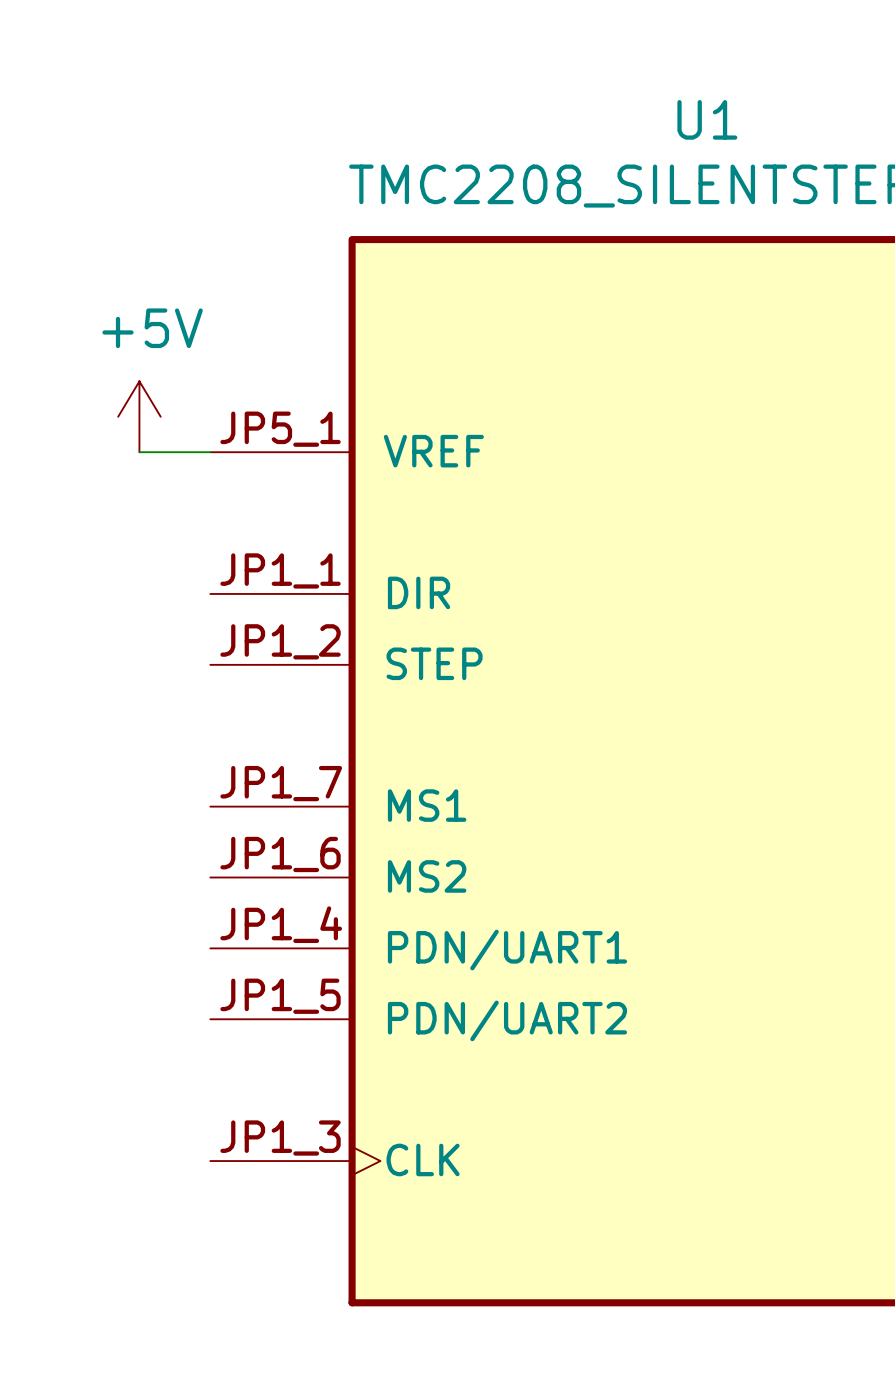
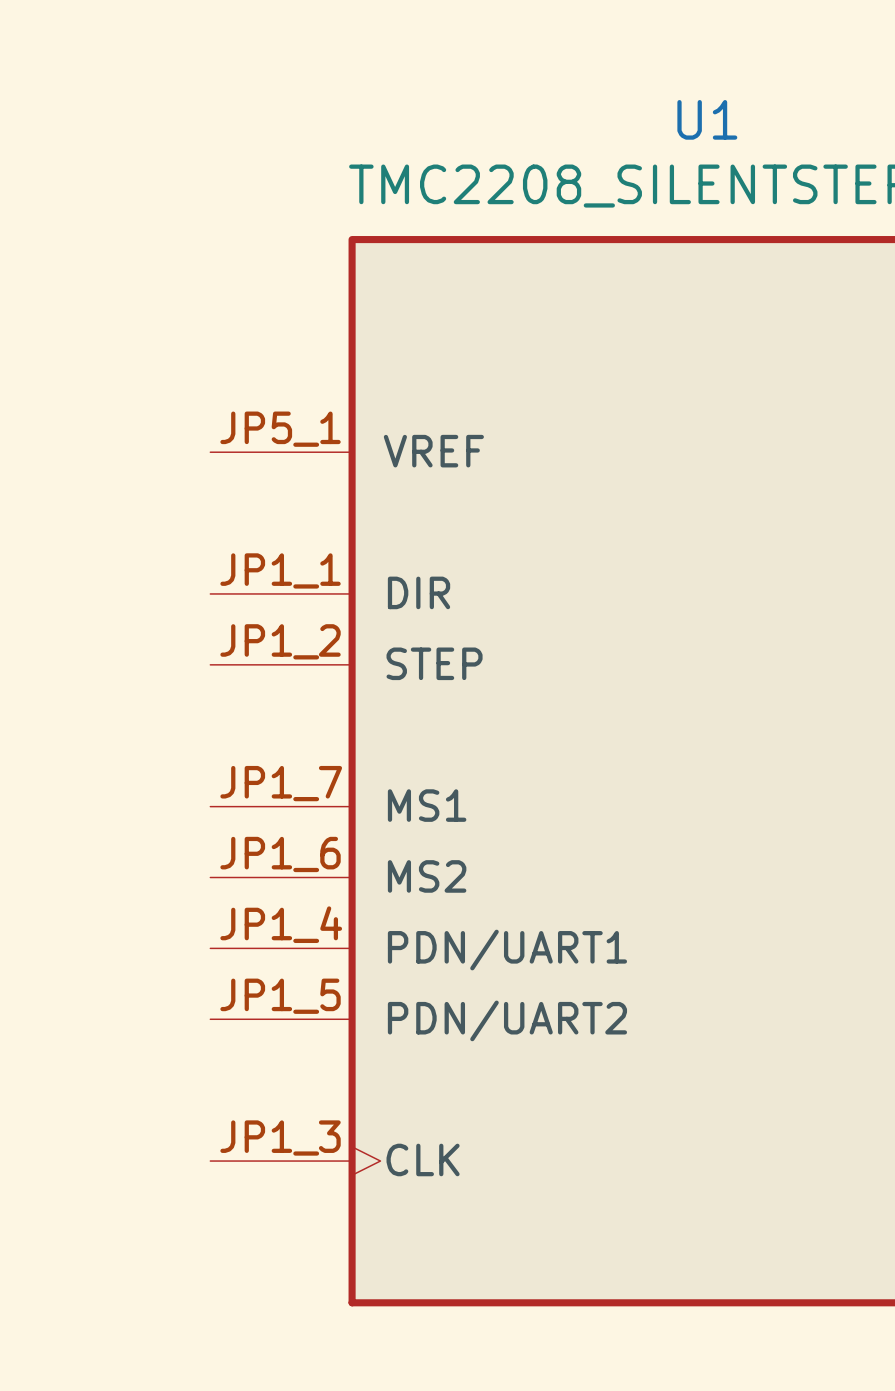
power symbol: +5V (139, 416) -> none
wire: (139, 452) (210, 452) -> none

